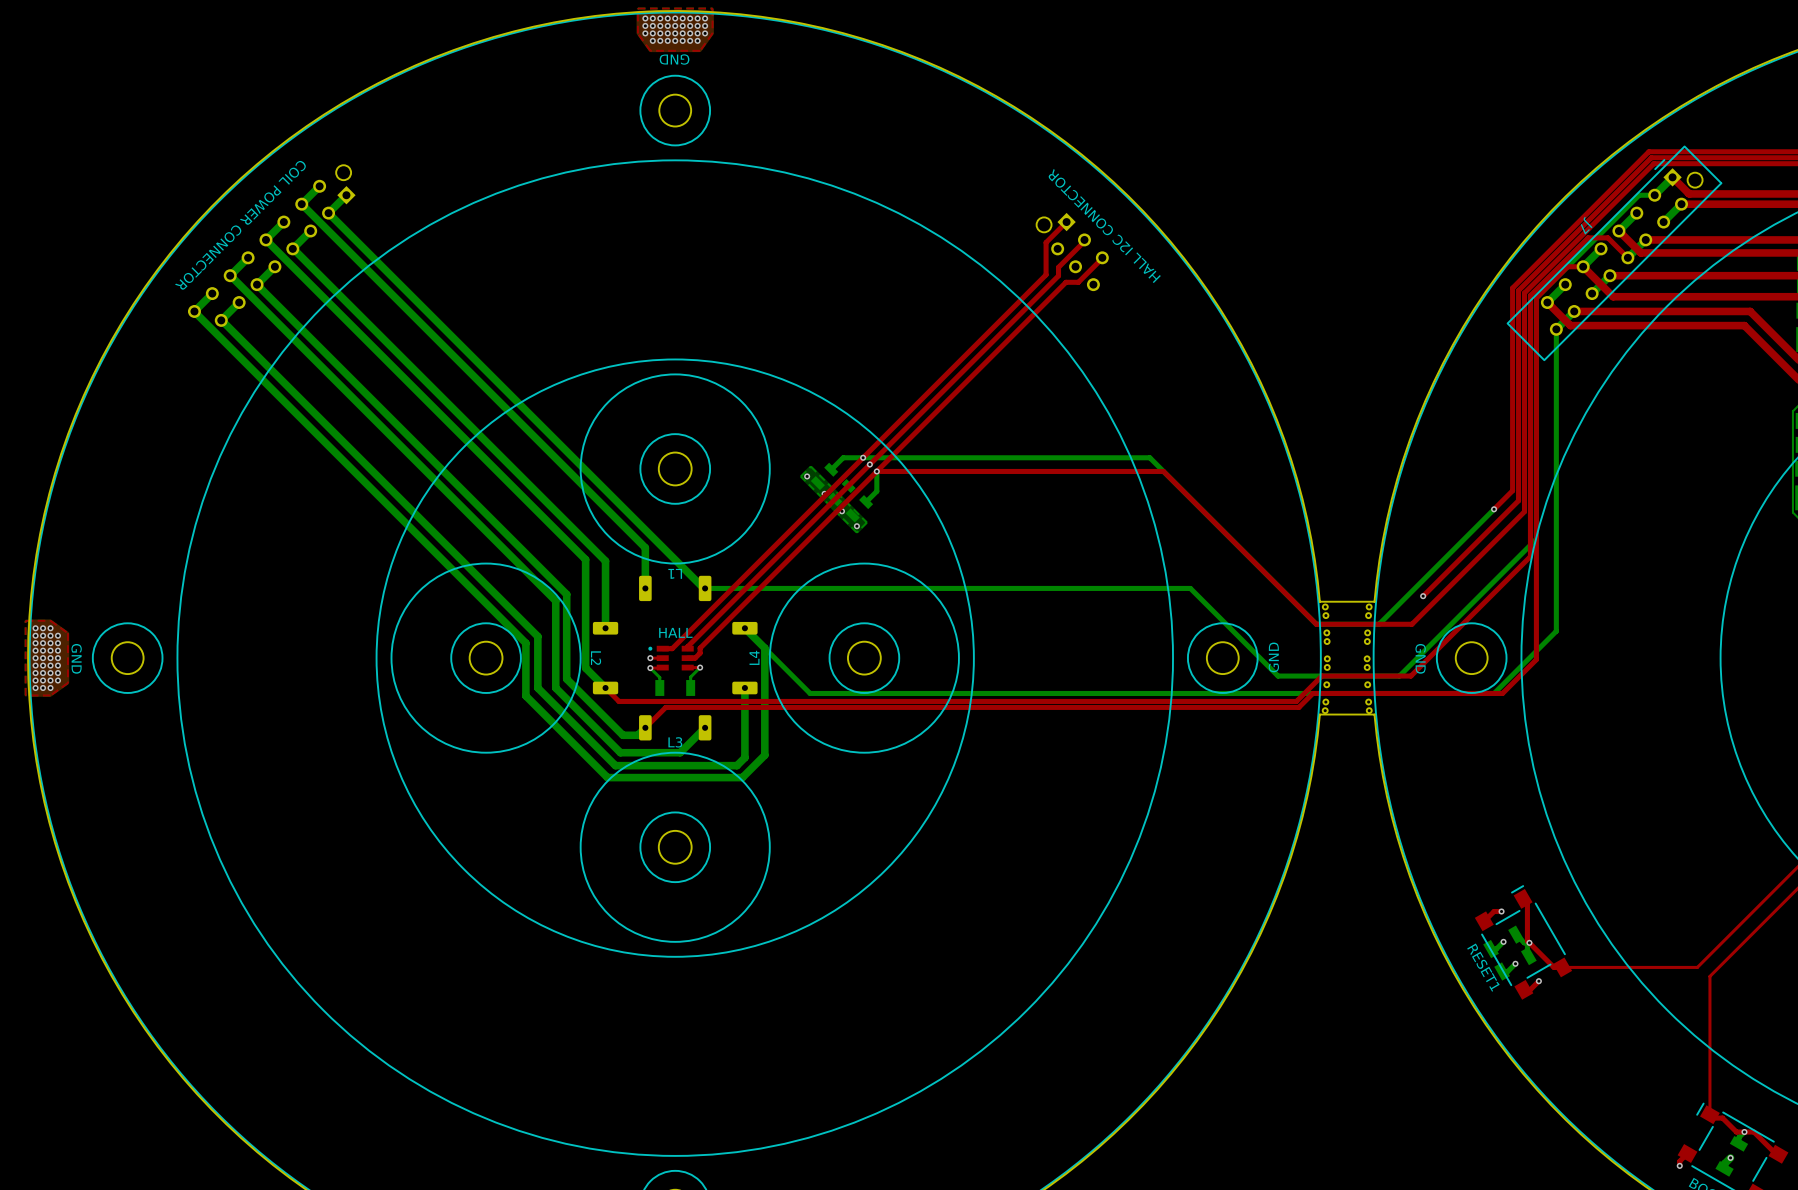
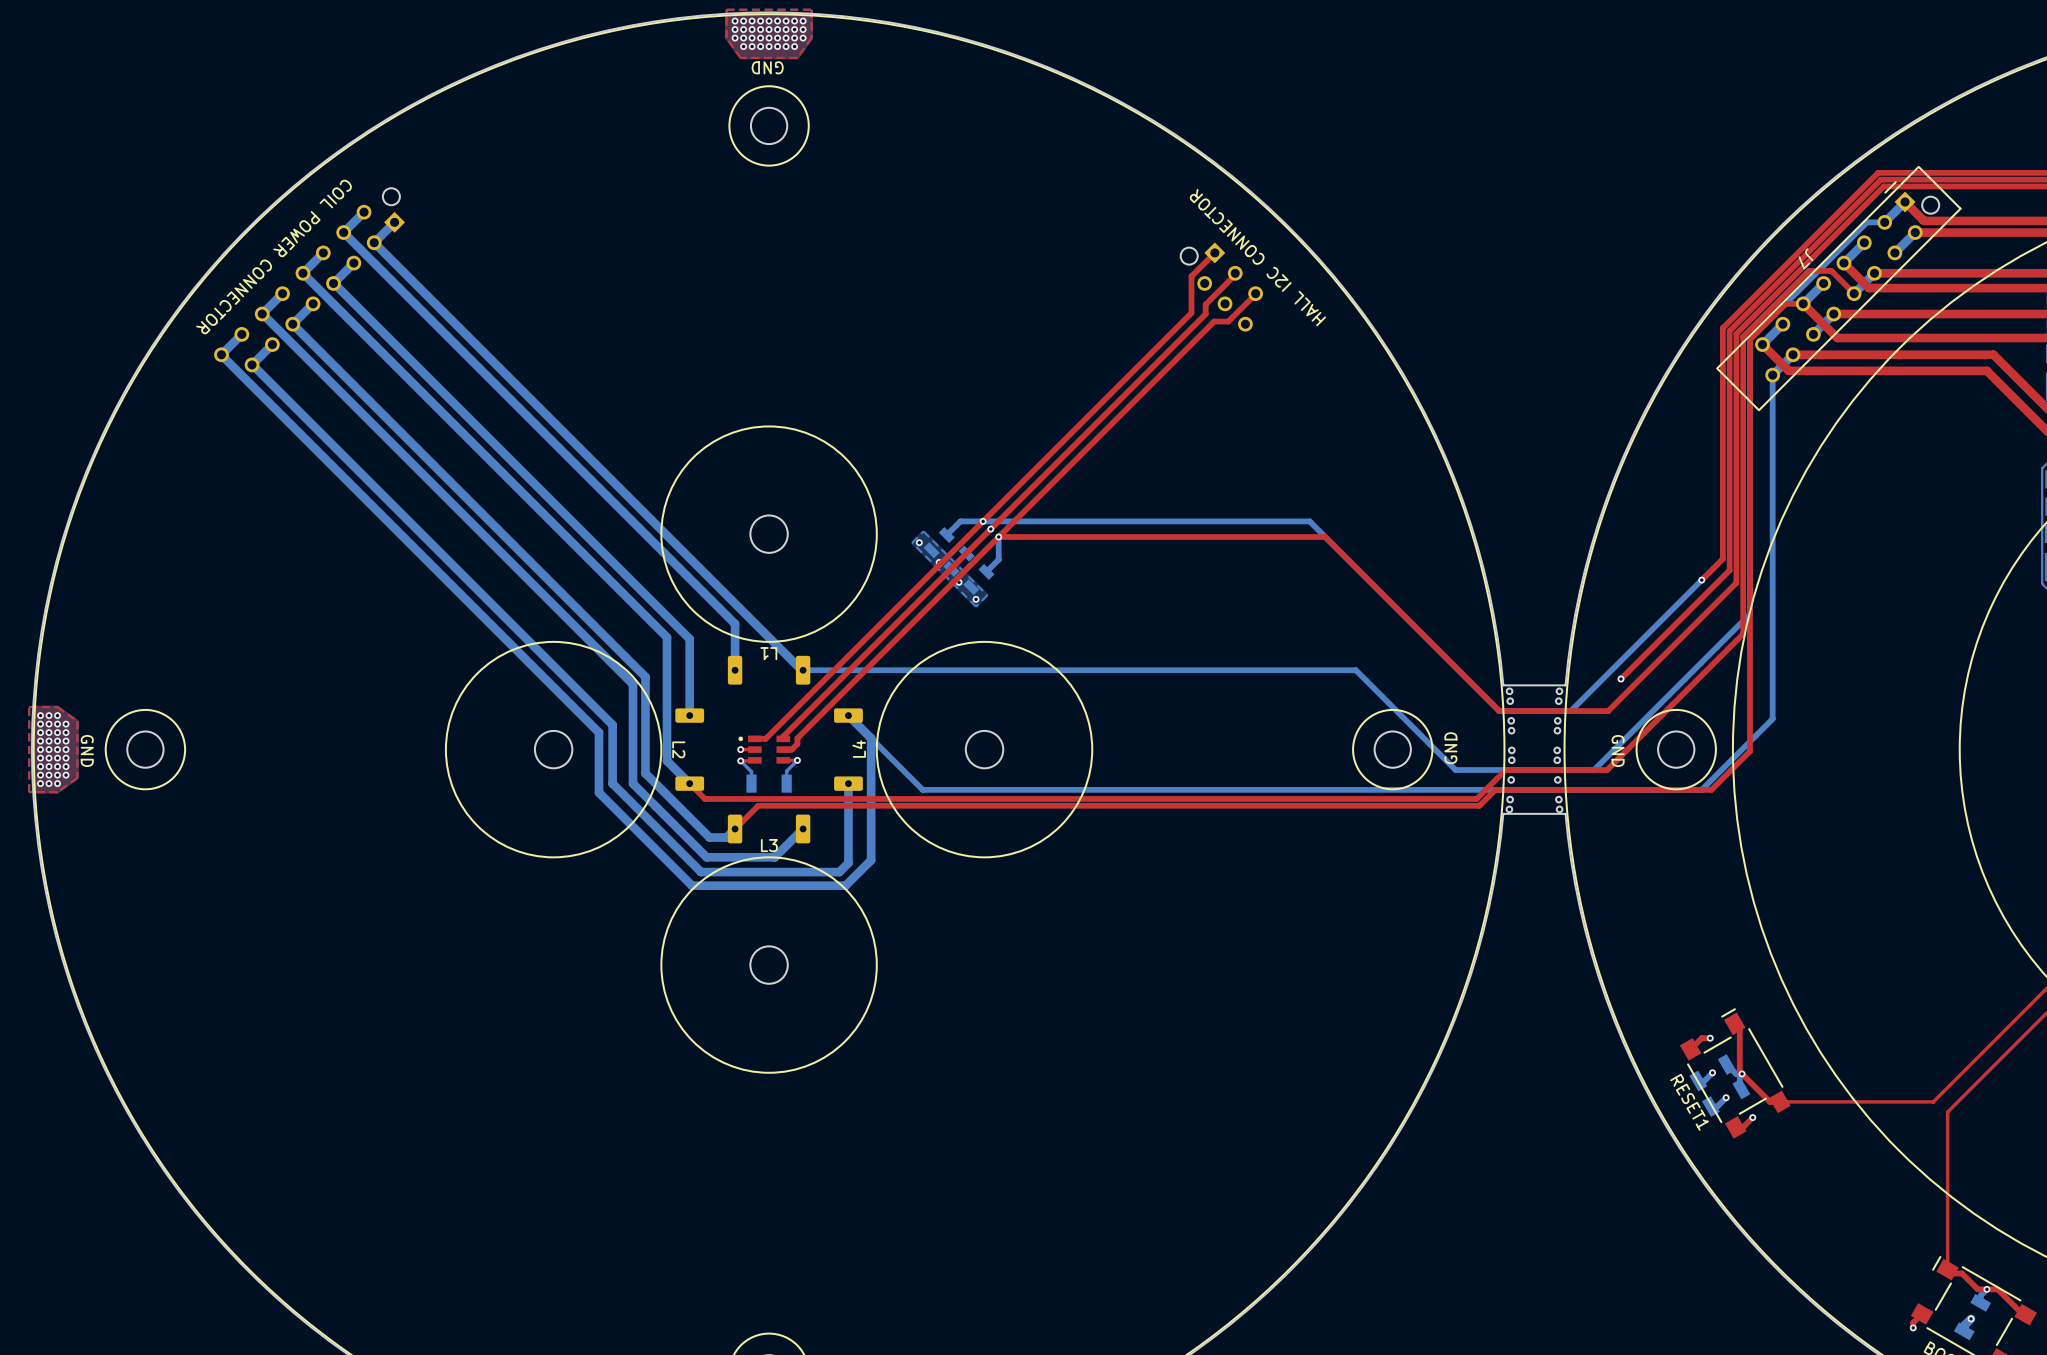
part footprint: [580, 373, 771, 602] -> [660, 425, 878, 685]
L2 footprint: [390, 563, 619, 754] -> [445, 641, 705, 858]
part footprint: [732, 563, 960, 754] -> [834, 641, 1093, 858]
HALL: (675, 658) -> none
part footprint: [580, 715, 771, 943] -> [660, 814, 878, 1074]

